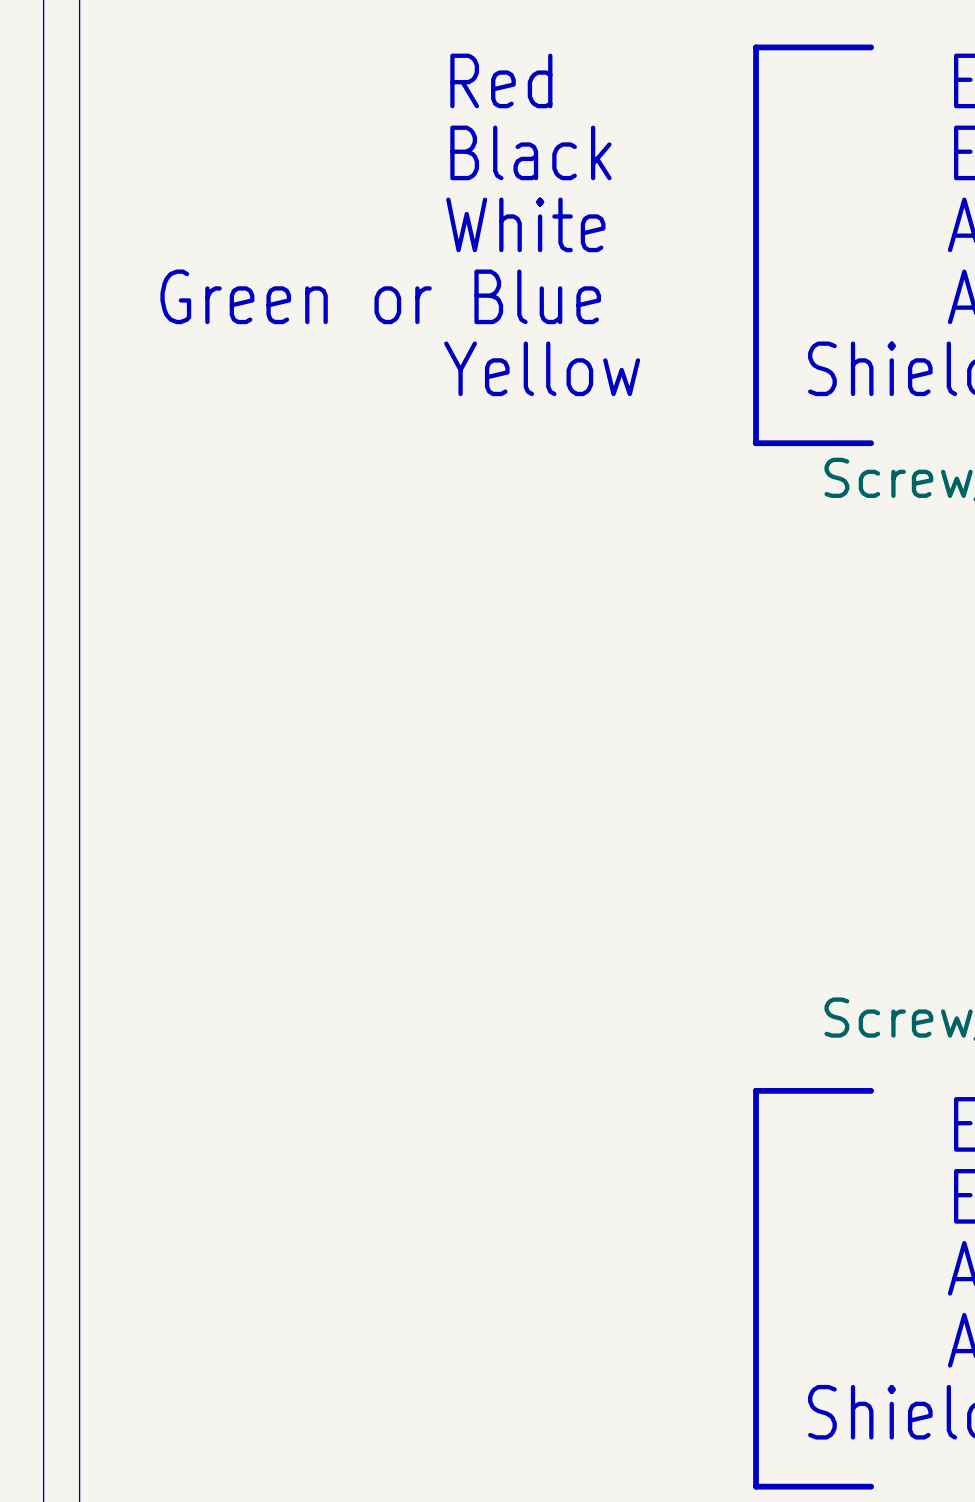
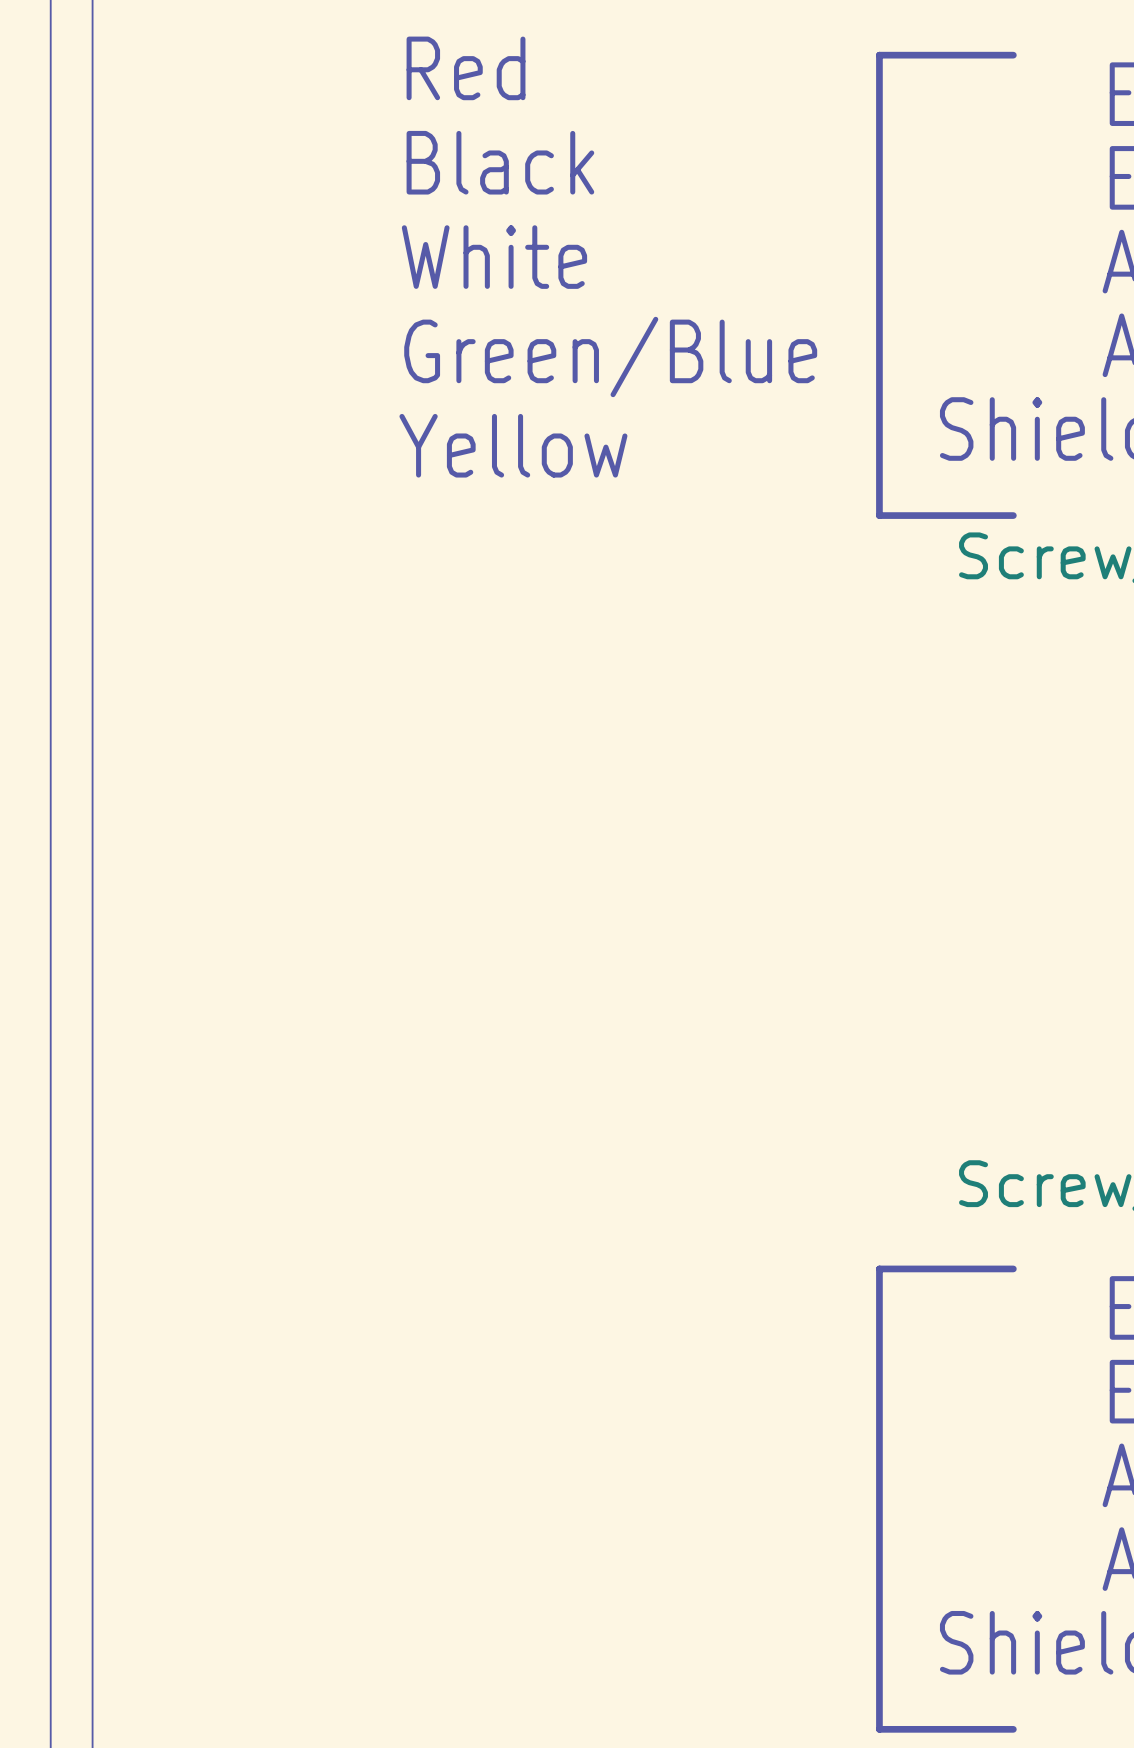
text position: Red (501, 80) -> Red (466, 68)
text position: Black (530, 152) -> Black (500, 162)
text position: White (525, 224) -> White (494, 257)
text: Green or Blue (380, 296) -> Green/Blue (610, 356)
text position: Yellow (542, 368) -> Yellow (513, 445)

